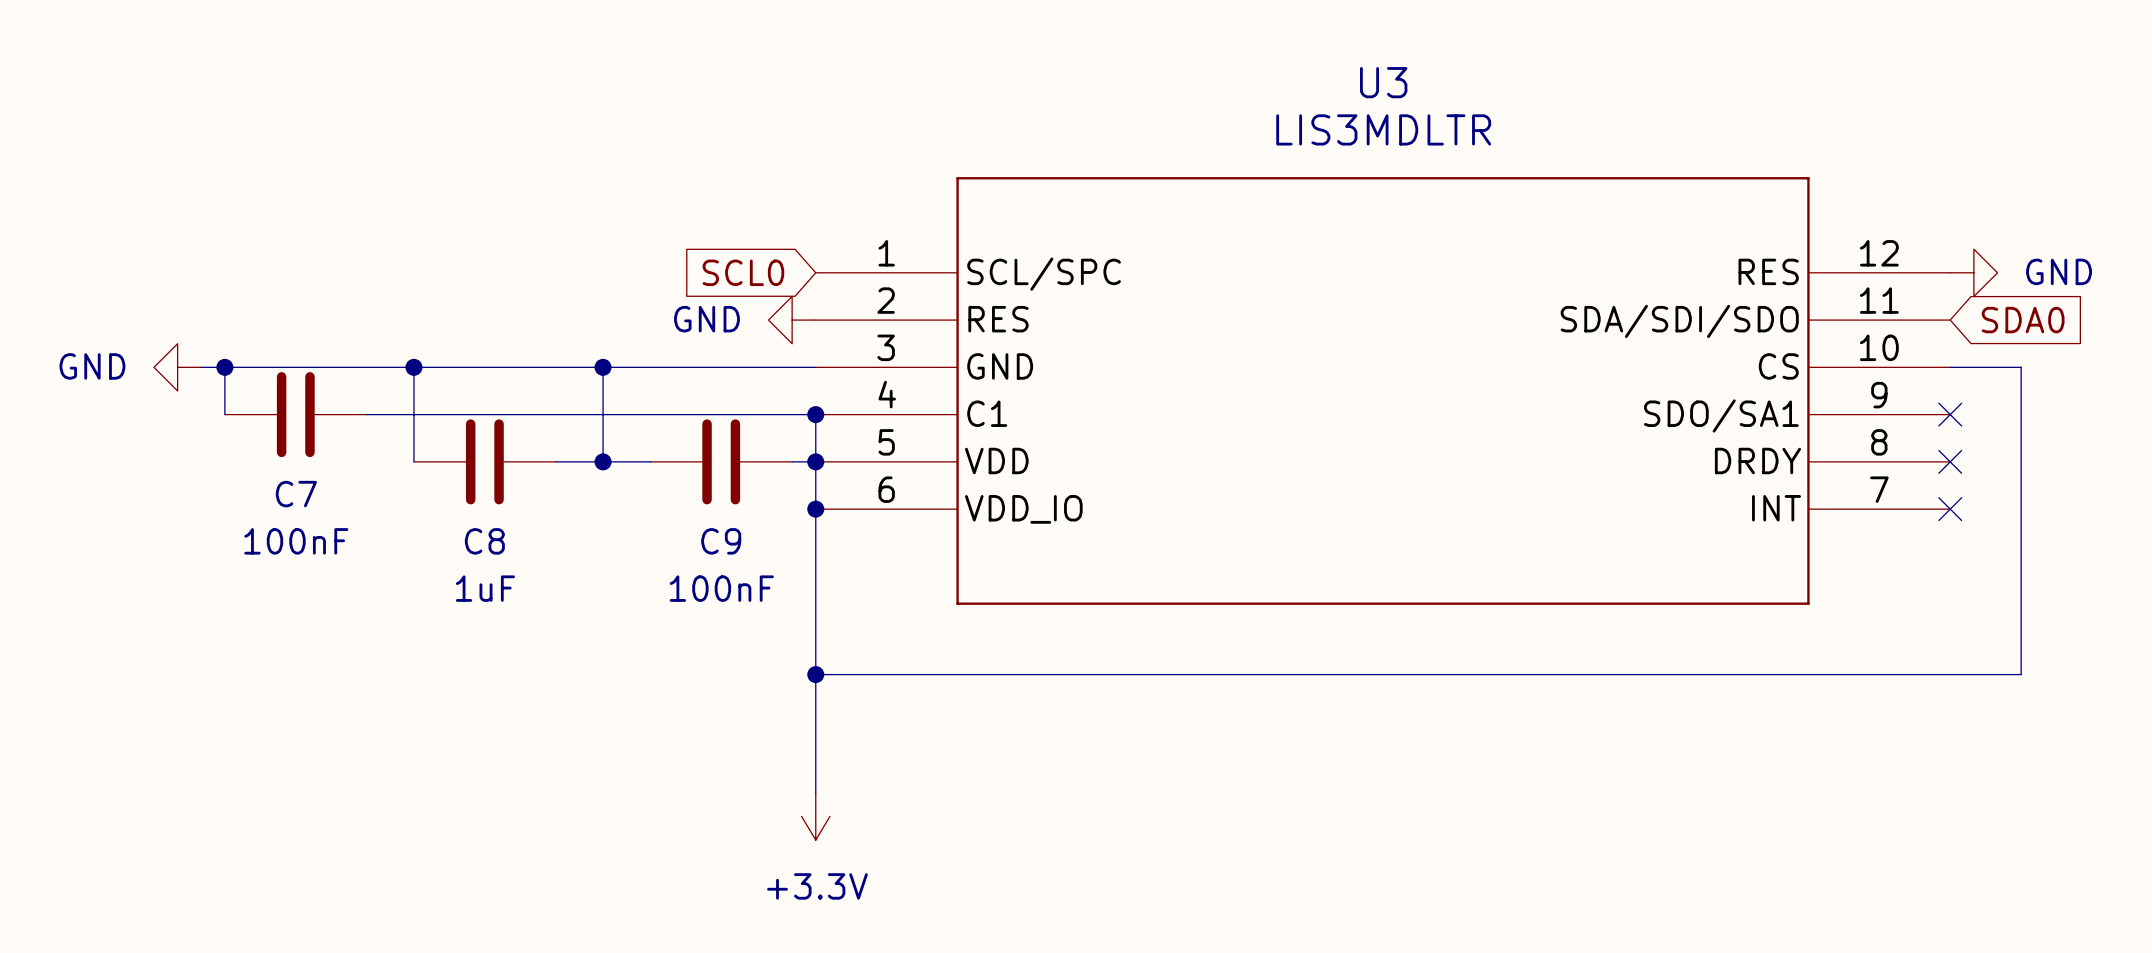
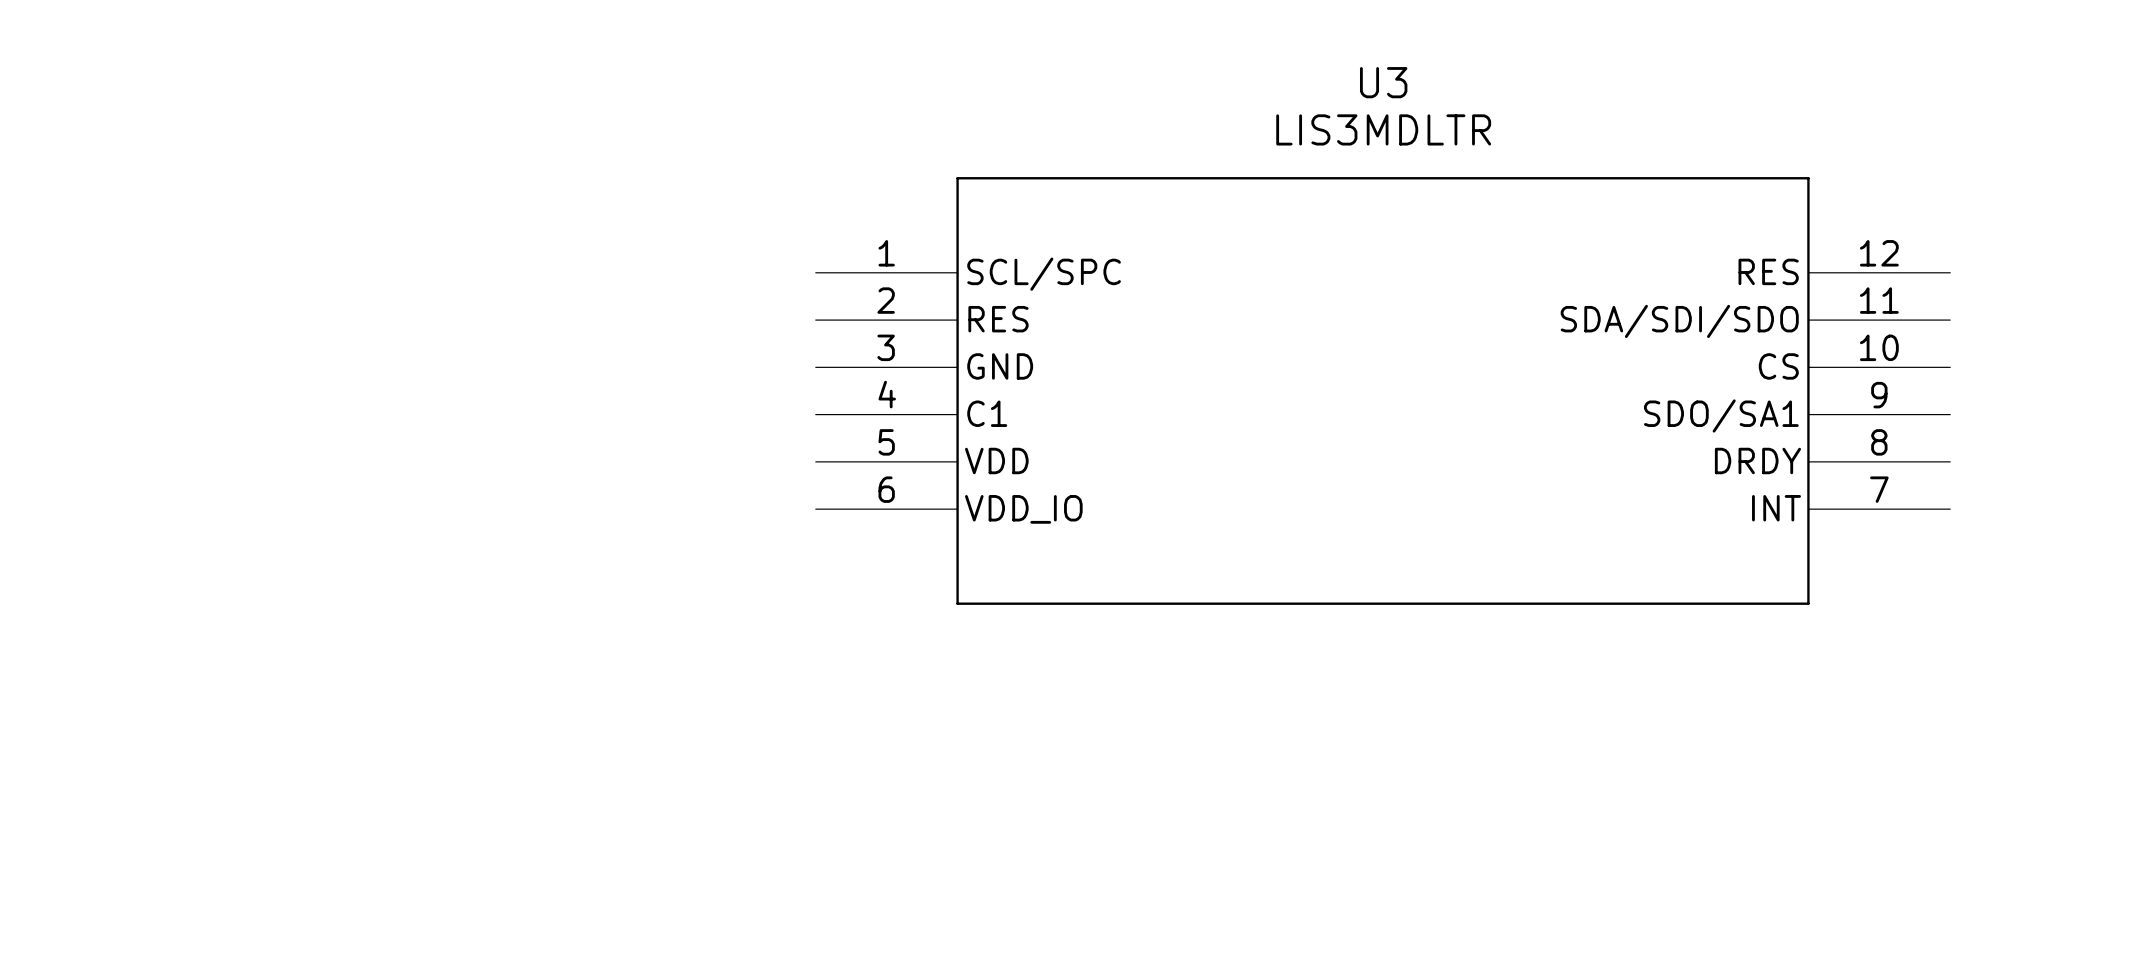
global label: SCL0 (743, 272) -> none
power symbol: GND (1973, 272) -> none
power symbol: GND (792, 320) -> none
global label: SDA0 (2023, 320) -> none
power symbol: GND (177, 367) -> none
wire: (201, 367) (815, 367) -> none
wire: (224, 367) (224, 414) -> none
junction: (224, 367) -> none
wire: (413, 367) (413, 461) -> none
junction: (413, 367) -> none
wire: (603, 367) (603, 461) -> none
junction: (603, 367) -> none
wire: (1950, 367) (2021, 367) (2021, 674) (815, 674) -> none
C7: 100nF (295, 414) -> none
wire: (366, 414) (815, 414) (815, 792) -> none
junction: (815, 414) -> none
no-connect mark: (1950, 414) -> none
C8: 1uF (484, 461) -> none
wire: (555, 461) (650, 461) -> none
junction: (603, 461) -> none
C9: 100nF (721, 461) -> none
wire: (792, 461) (815, 461) -> none
junction: (815, 461) -> none
no-connect mark: (1950, 461) -> none
junction: (815, 509) -> none
no-connect mark: (1950, 509) -> none
junction: (815, 674) -> none
power symbol: +3.3V (815, 816) -> none

